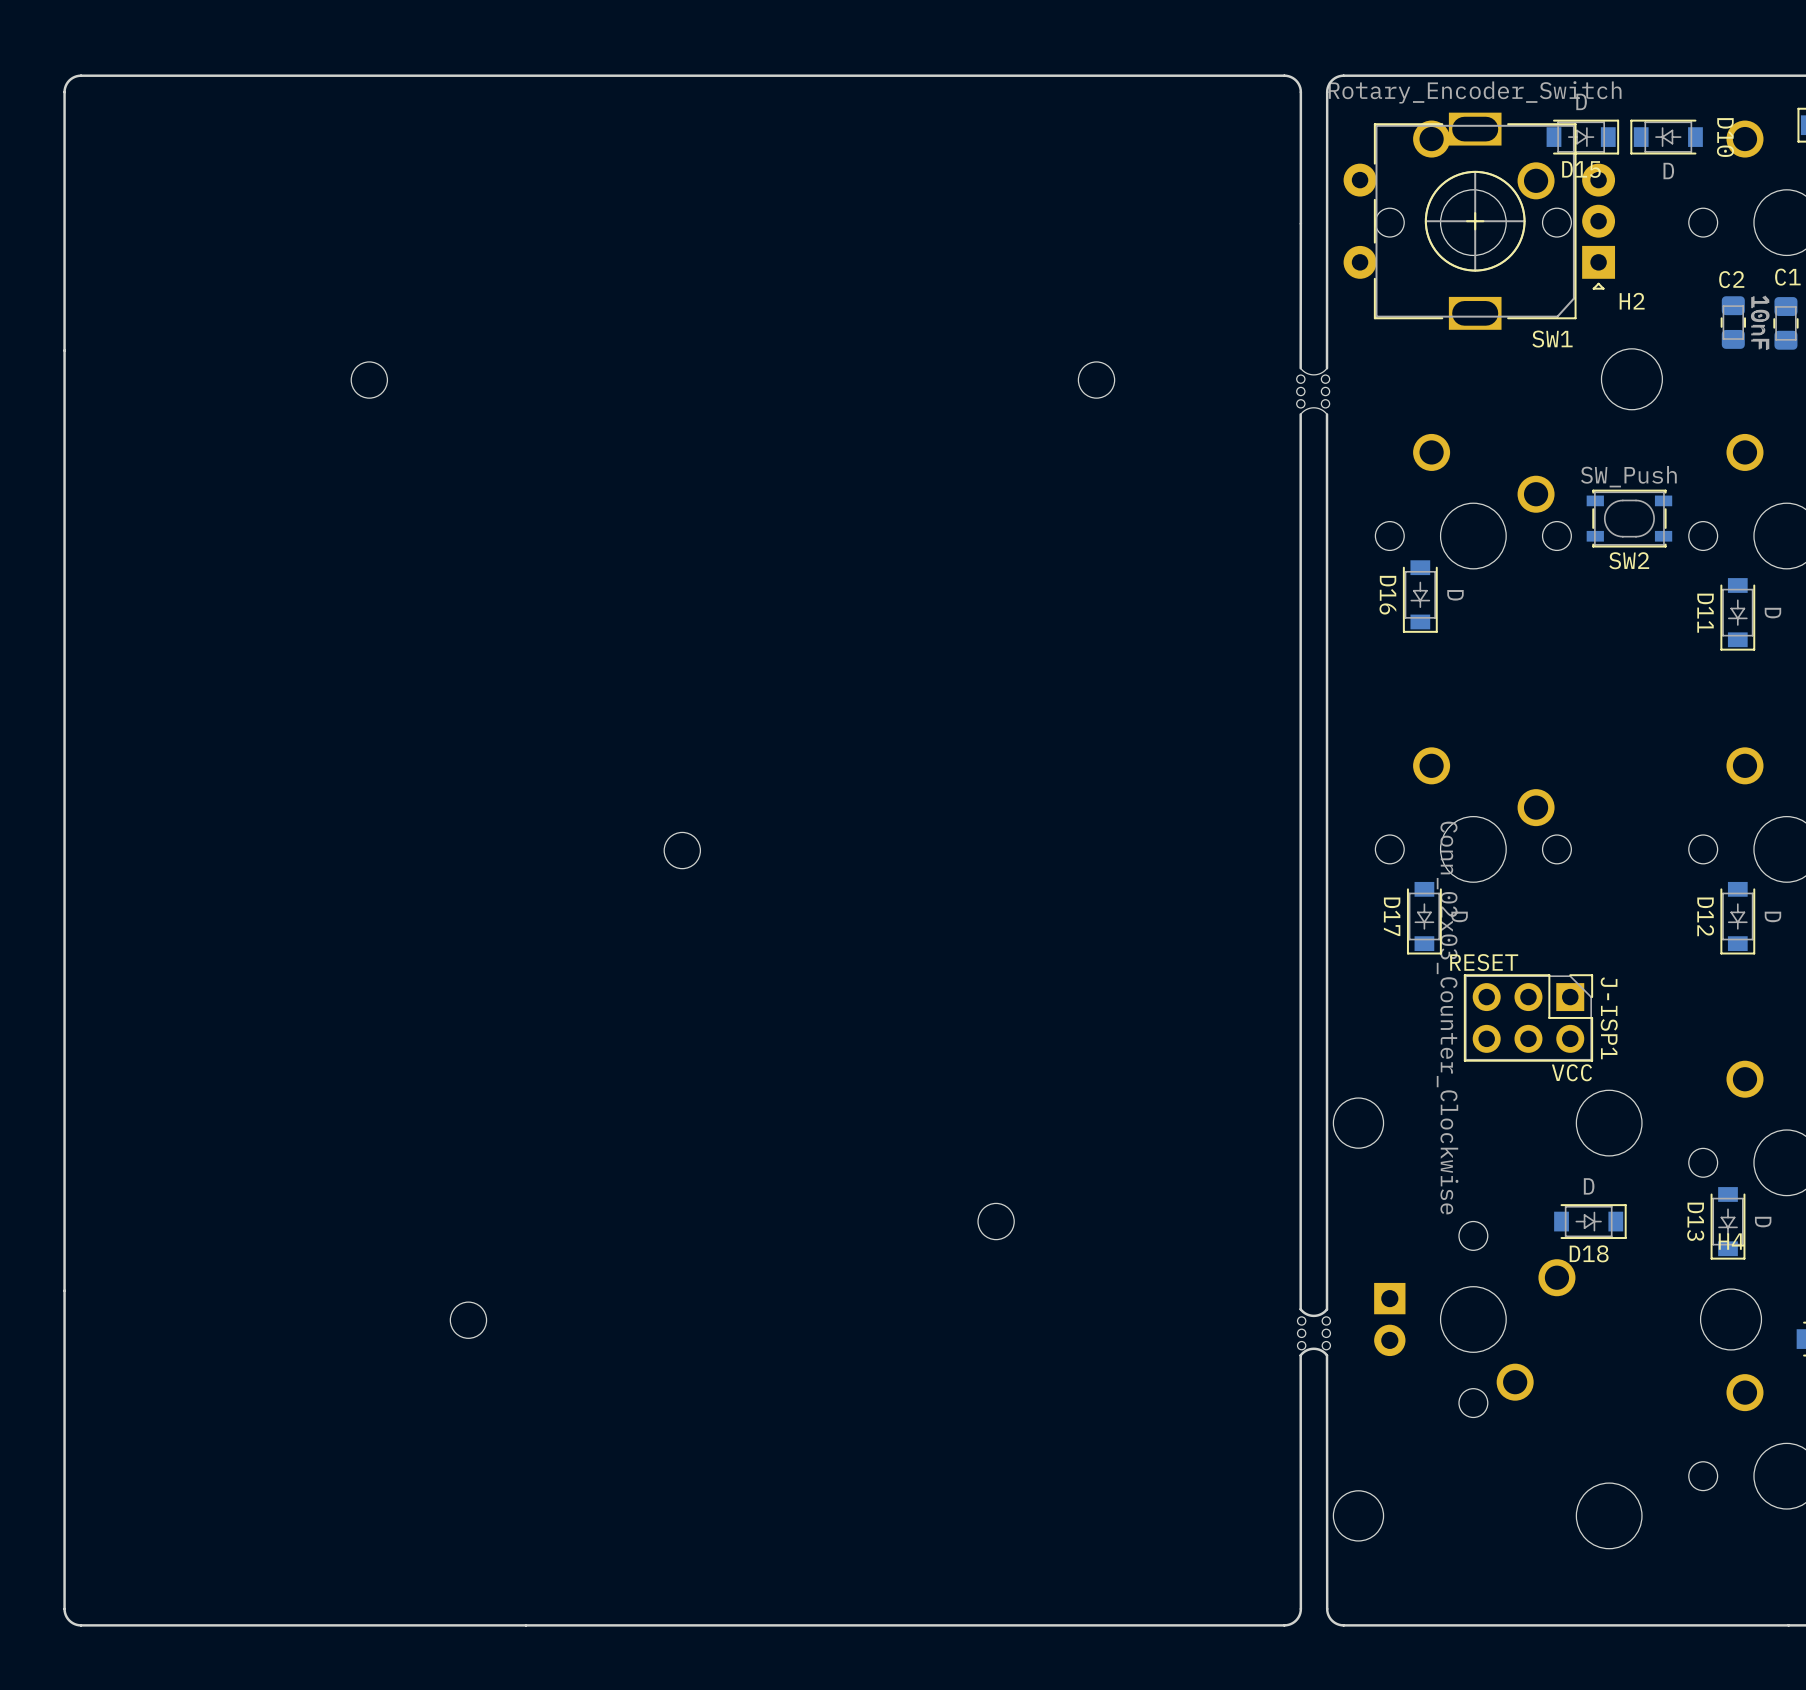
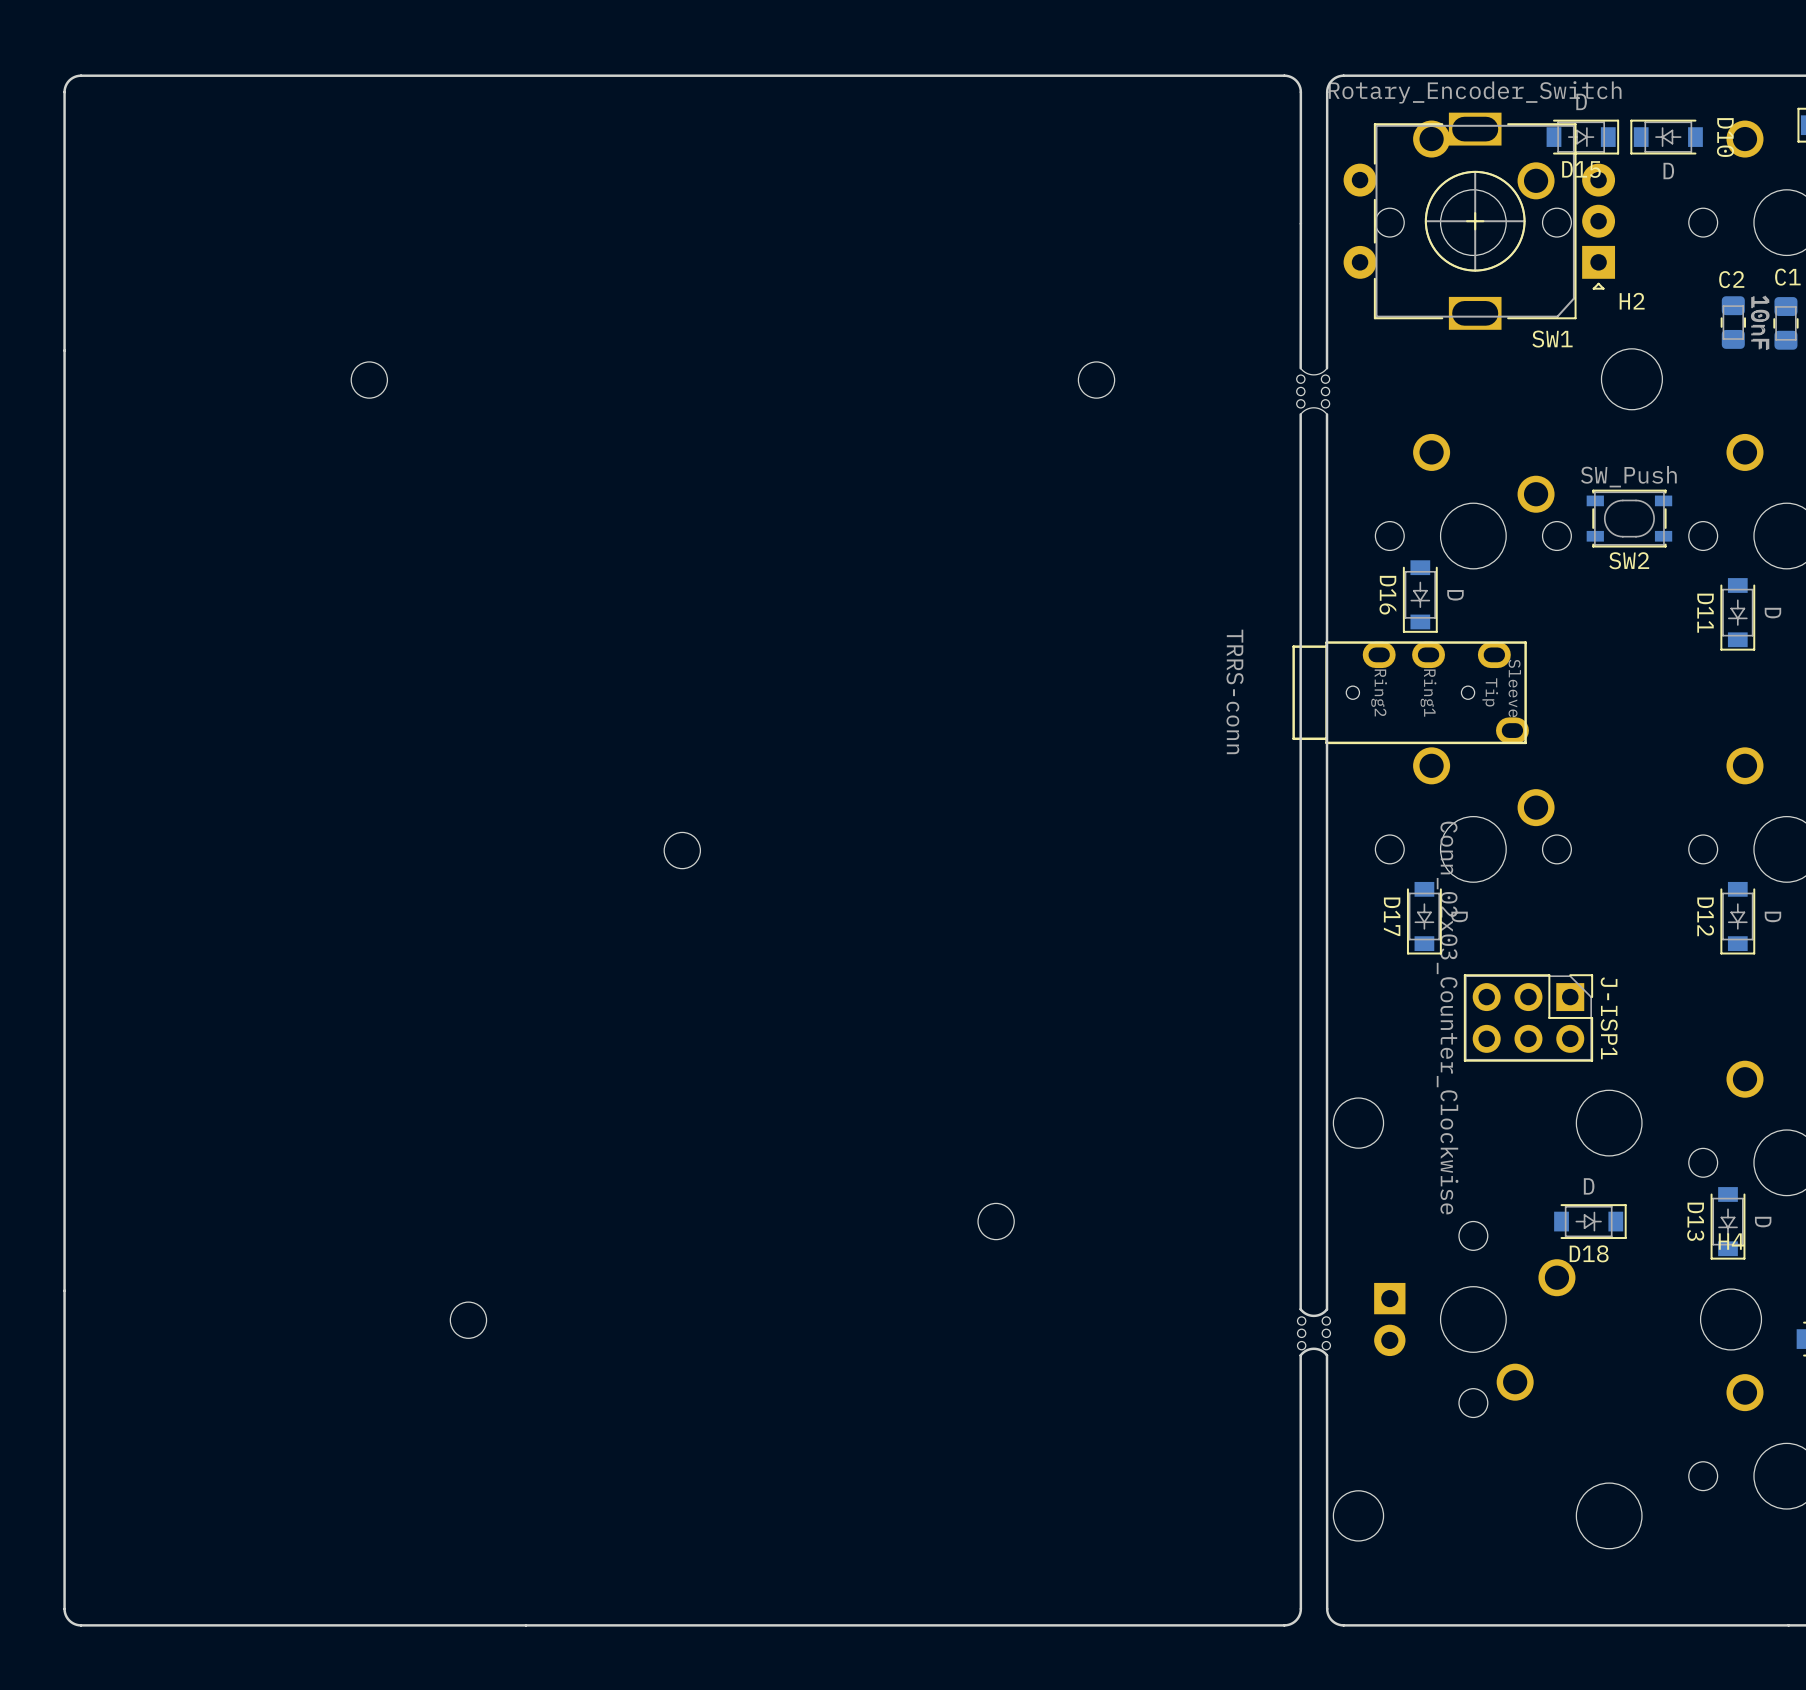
part: none -> TRRS-conn (1410, 692)
text: RESET (1484, 962) -> none
text: VCC (1571, 1072) -> none

